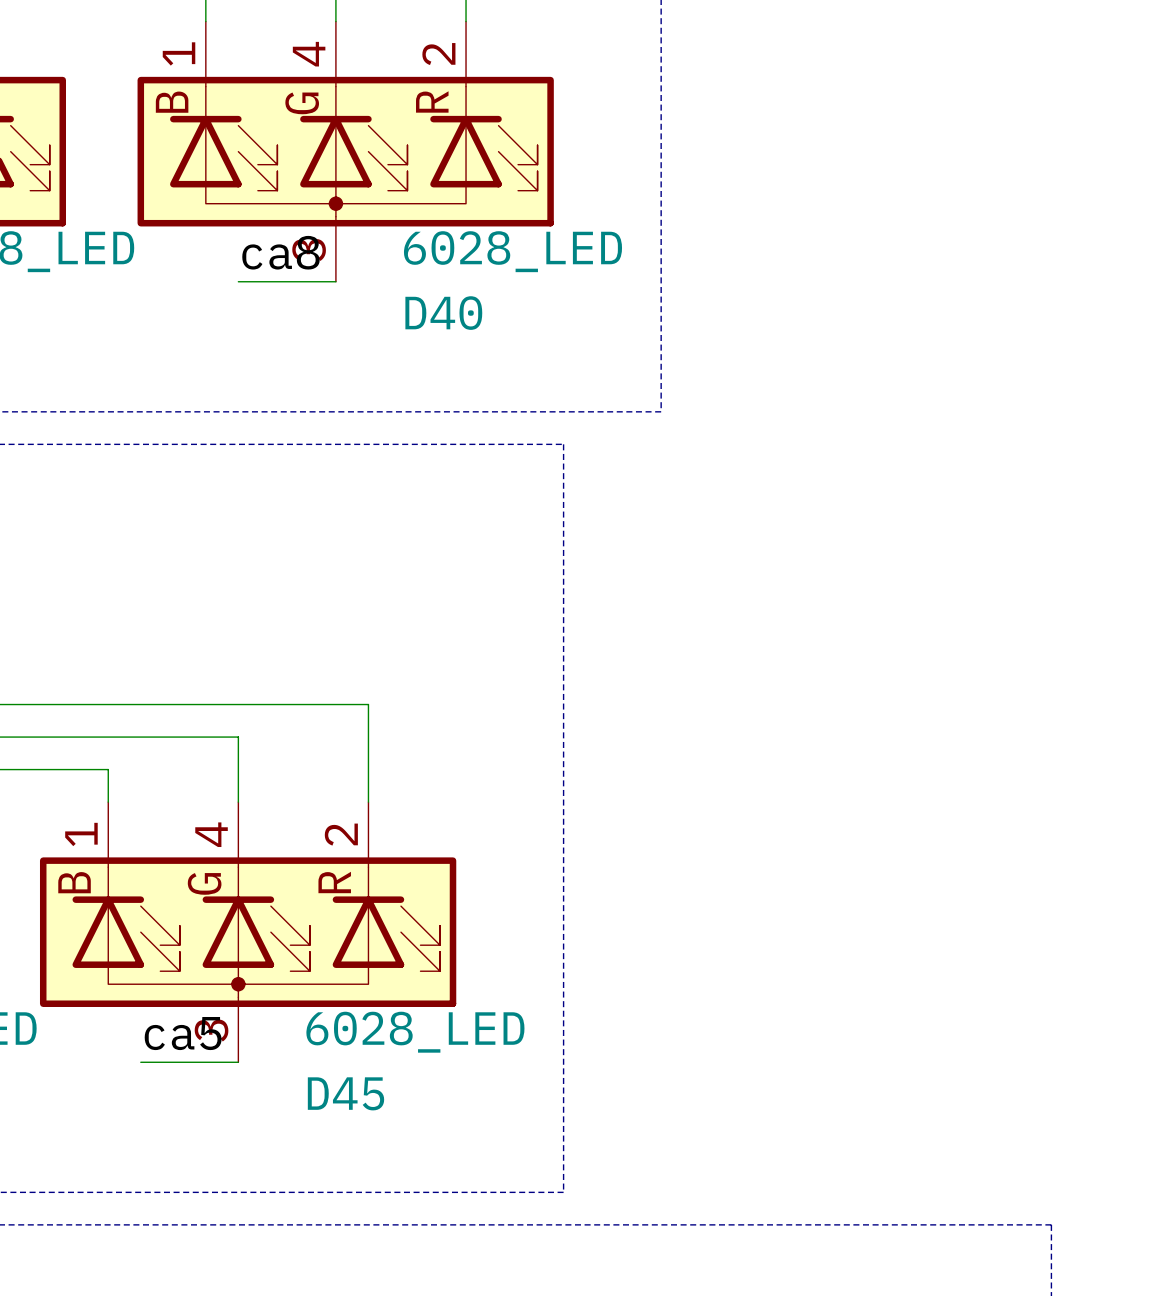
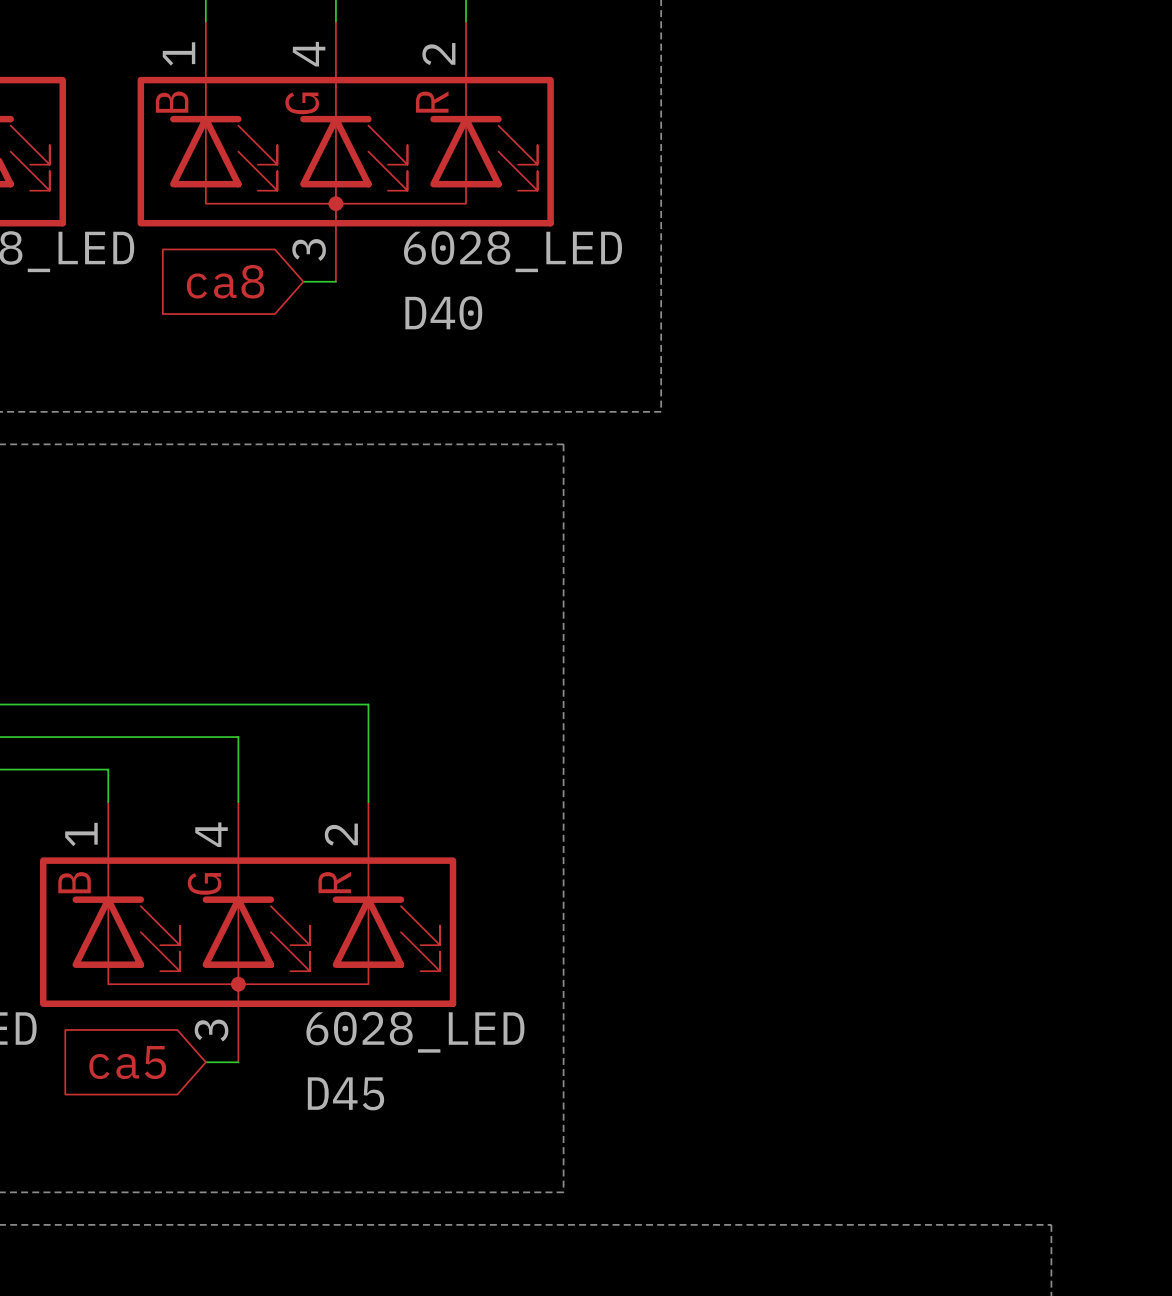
label: ca8 (280, 252) -> none
global label: none -> ca8 (225, 281)
wire: (238, 281) (303, 281) -> none
label: ca5 (183, 1033) -> none
global label: none -> ca5 (127, 1062)
wire: (140, 1062) (205, 1062) -> none

